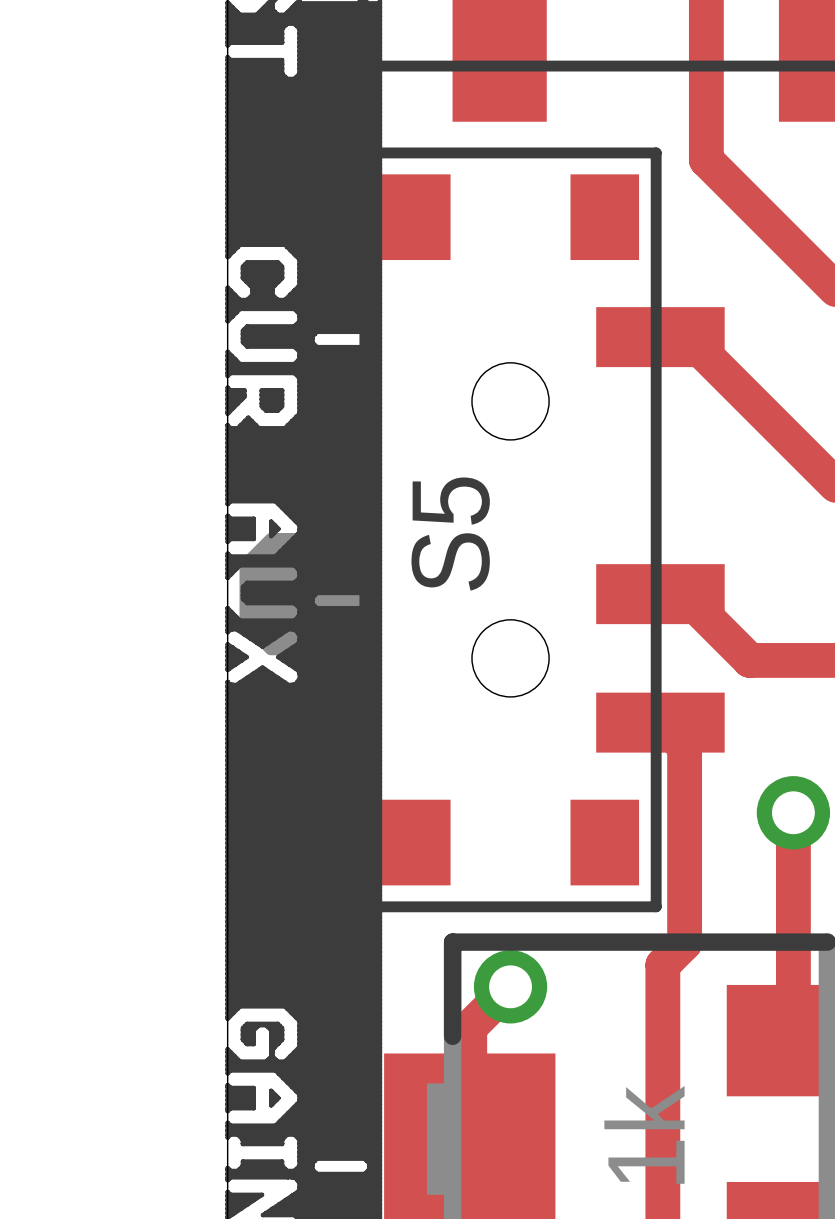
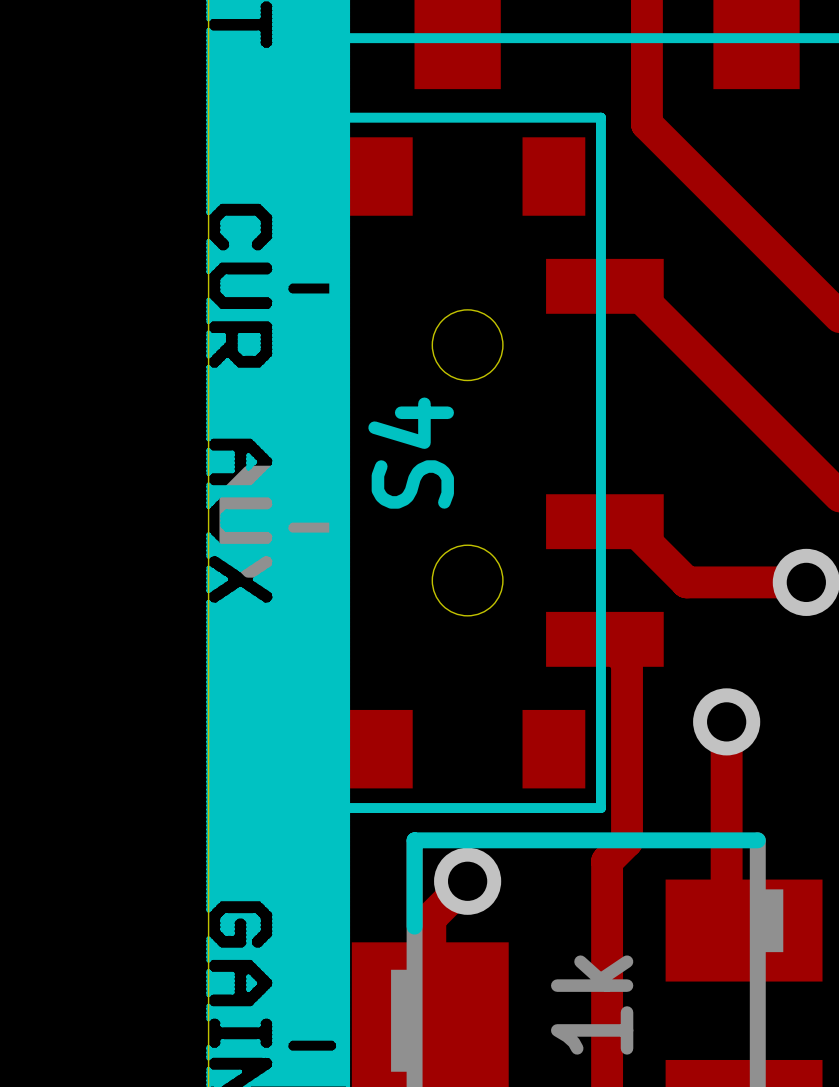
S5 name: S5 (450, 534) -> S4 (411, 453)

